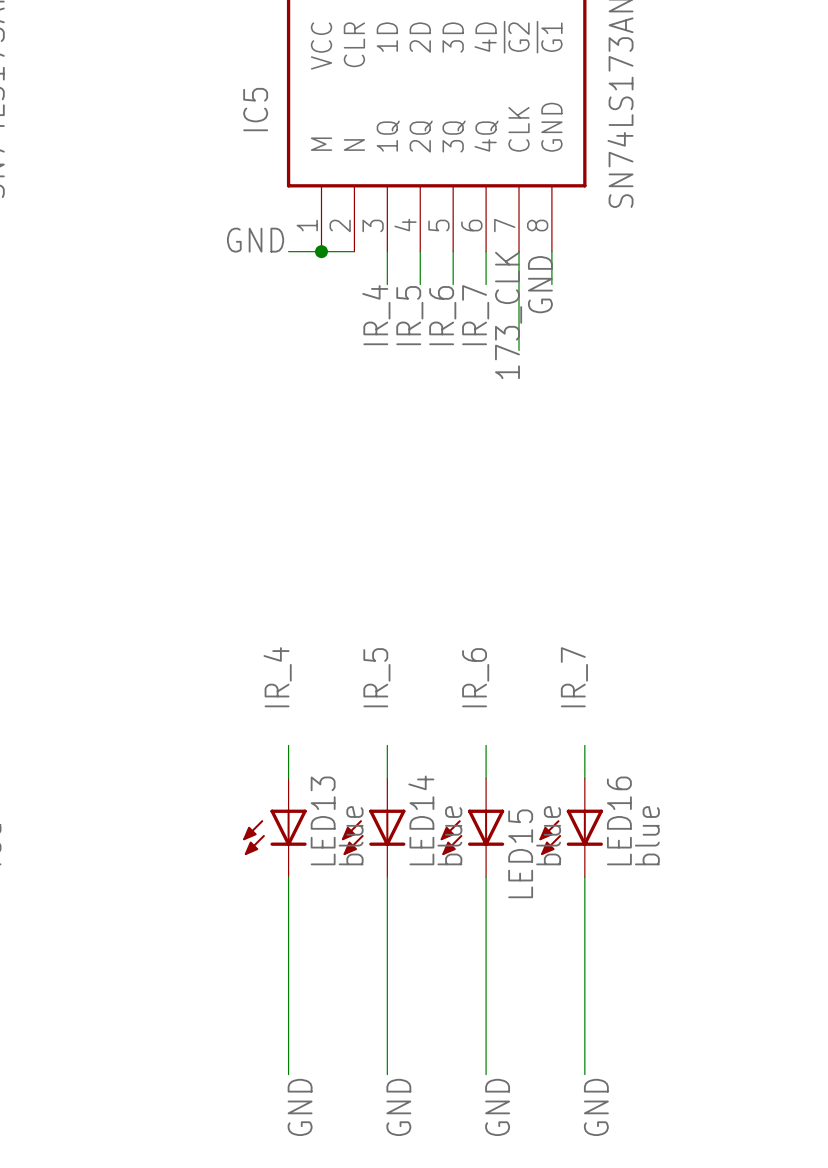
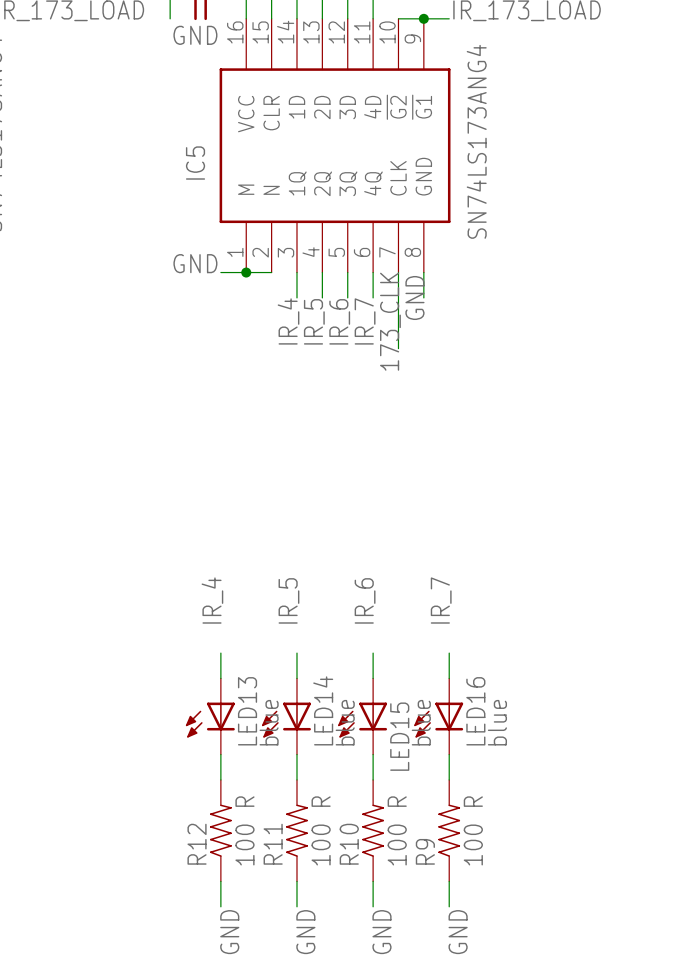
R12: none -> 100 R (220, 830)
R11: none -> 100 R (296, 830)
R10: none -> 100 R (373, 830)
R9: none -> 100 R (449, 830)

